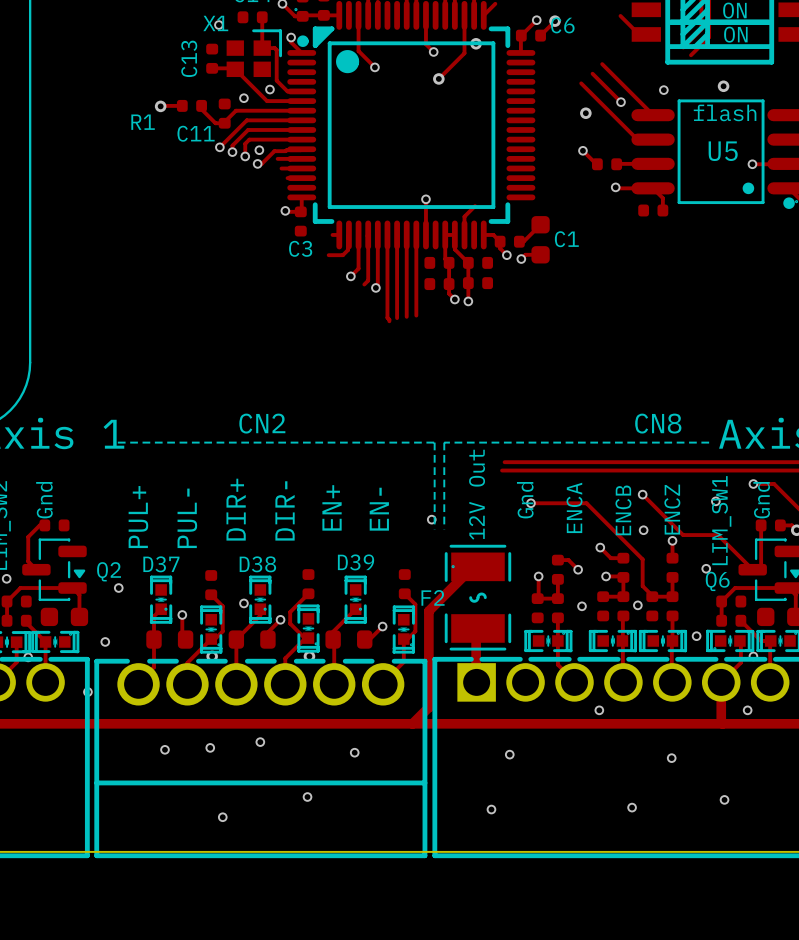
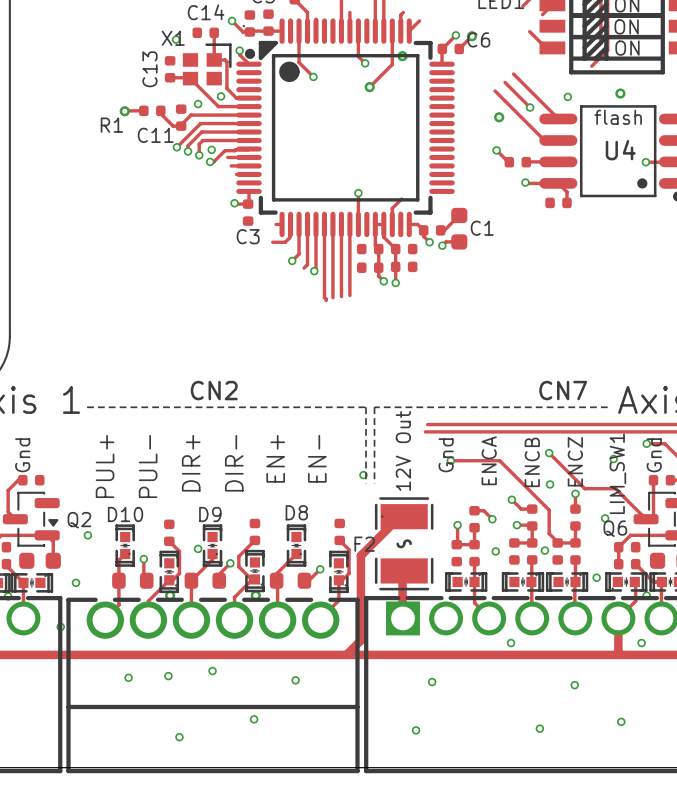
U5 name: U5 (723, 151) -> U4 (620, 150)
CN8 name: CN8 (658, 423) -> CN7 (563, 390)
D39 name: D39 (356, 562) -> D8 (296, 512)
D37 name: D37 (161, 564) -> D10 (125, 514)
D38 name: D38 (257, 564) -> D9 (210, 514)

